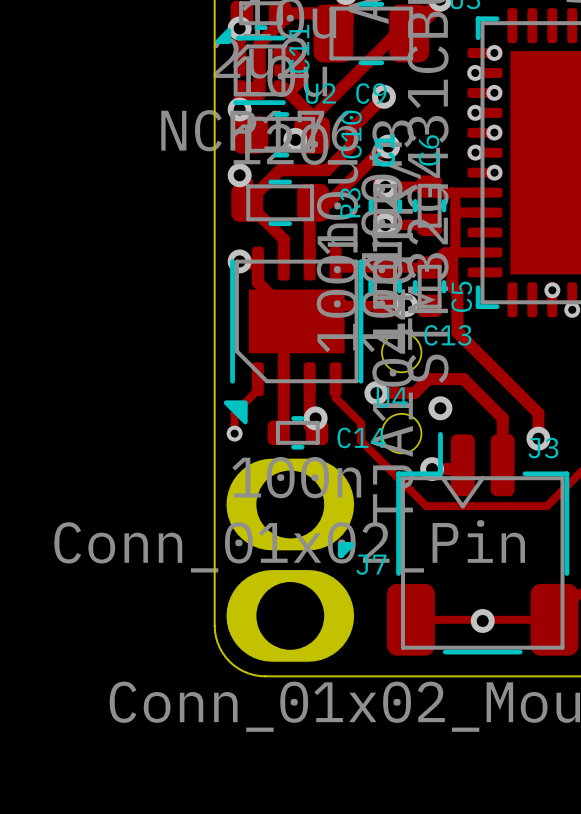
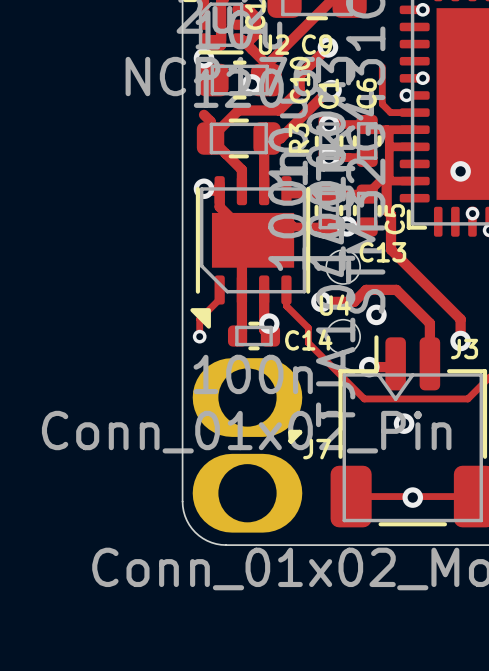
via: (475, 72) -> none
via: (494, 92) -> none
via: (475, 112) -> none
track: none -> (382, 67) (382, 104) (390, 112) (414, 112)
via: (494, 172) -> none
via: (239, 175) -> none
via: none -> (460, 171)
via: none -> (404, 423)

